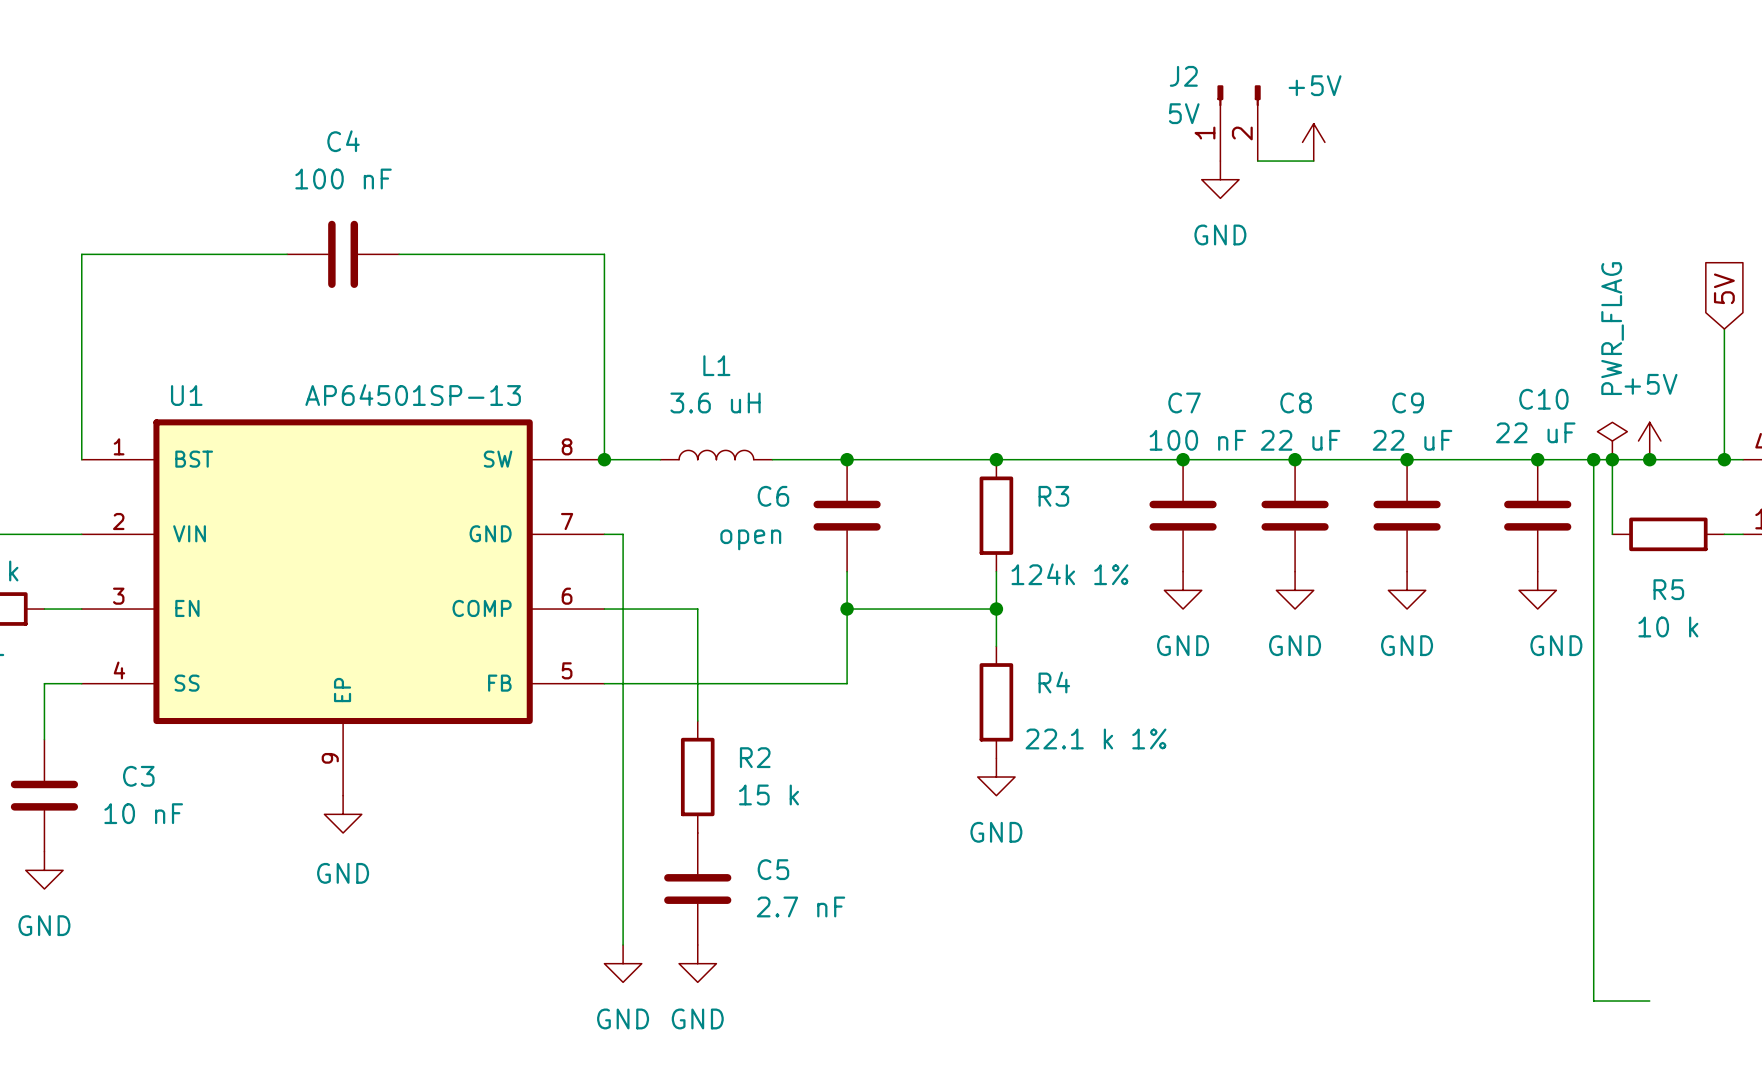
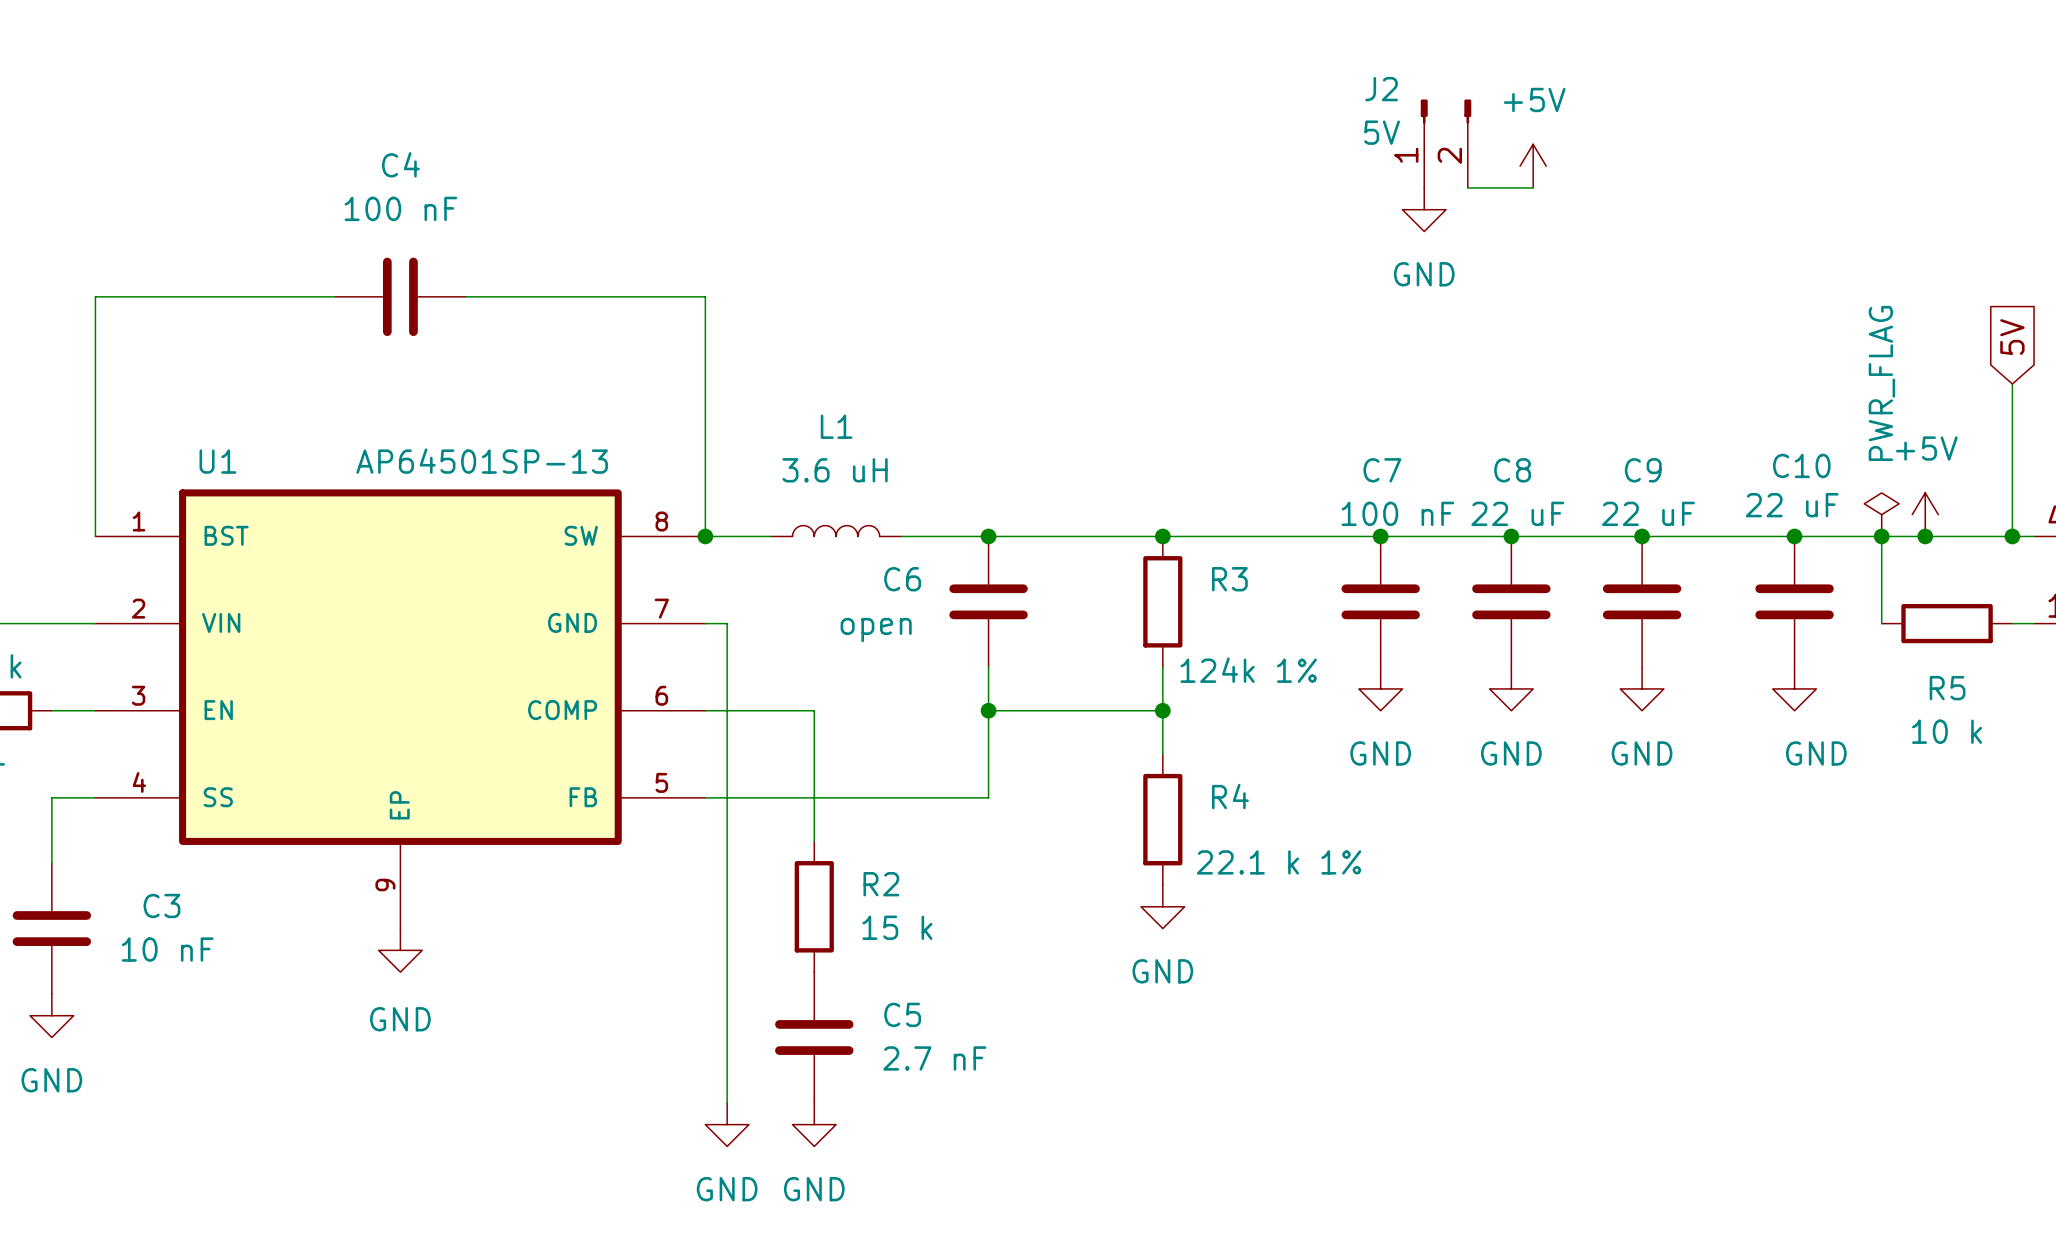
wire: (1593, 459) (1593, 1001) (1649, 1001) -> none
junction: (1593, 459) -> none

